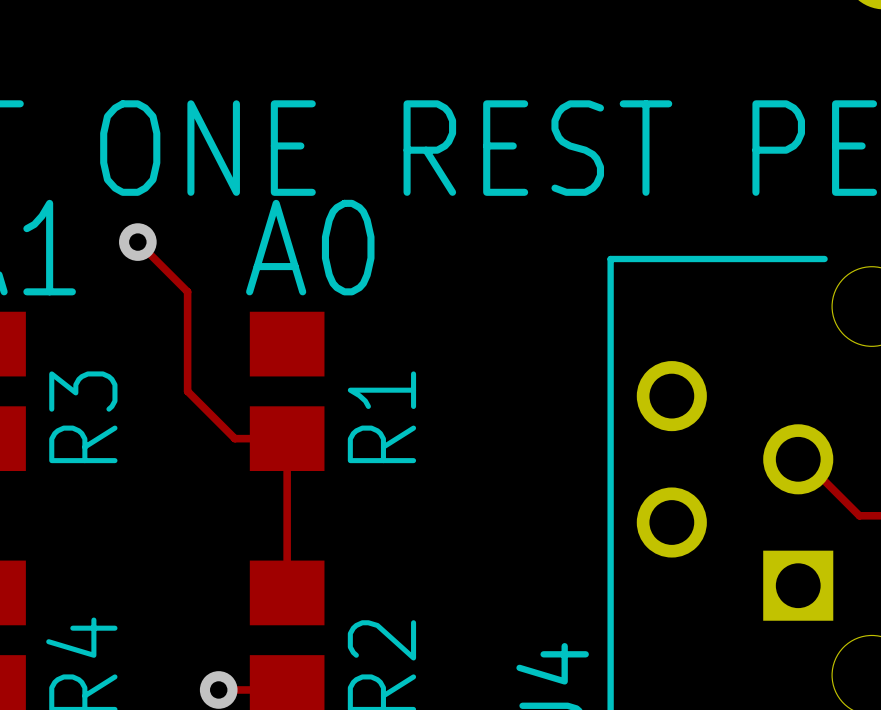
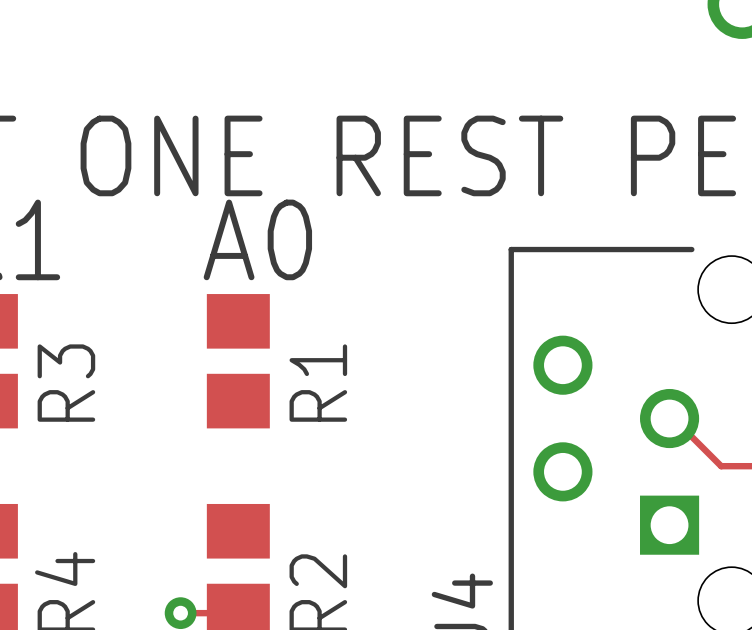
track: (137, 242) (187, 291) (187, 391) (234, 438) (287, 438) (287, 592) -> none
via: (137, 242) -> none

